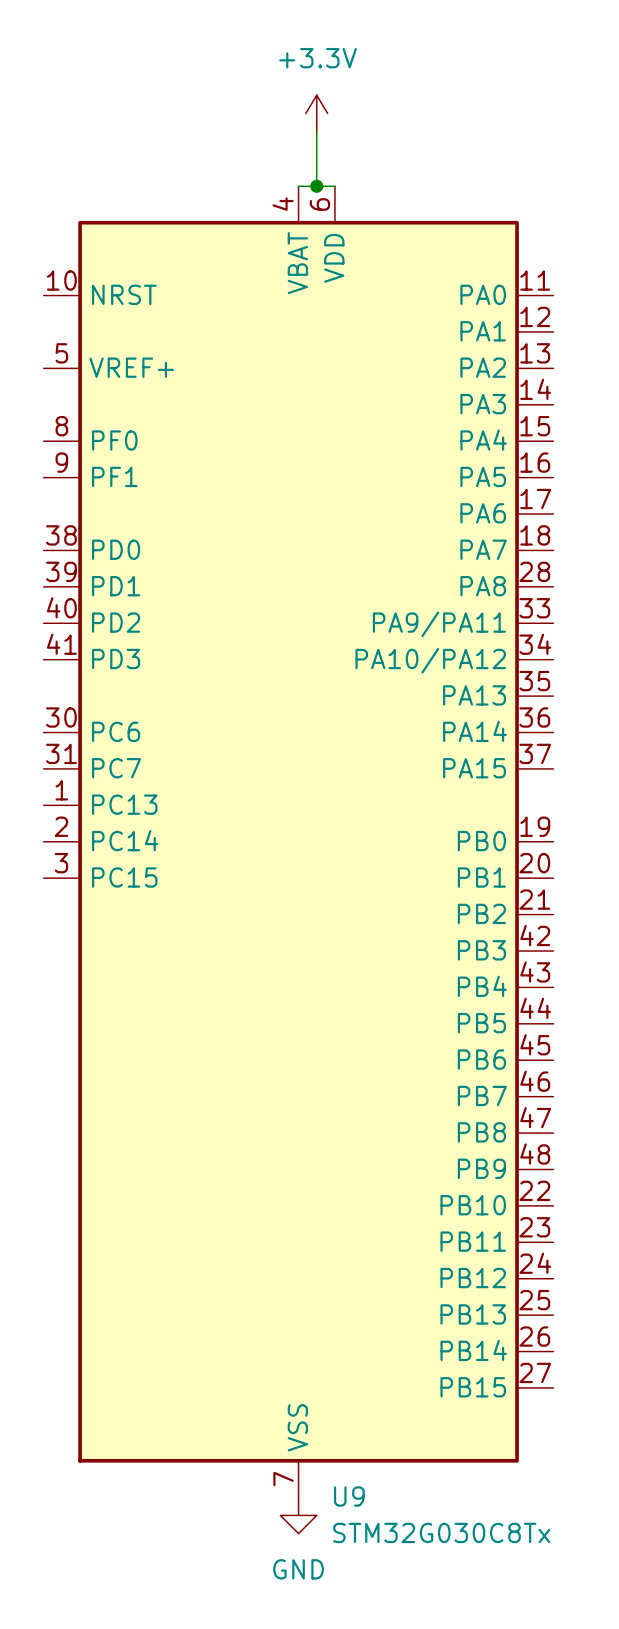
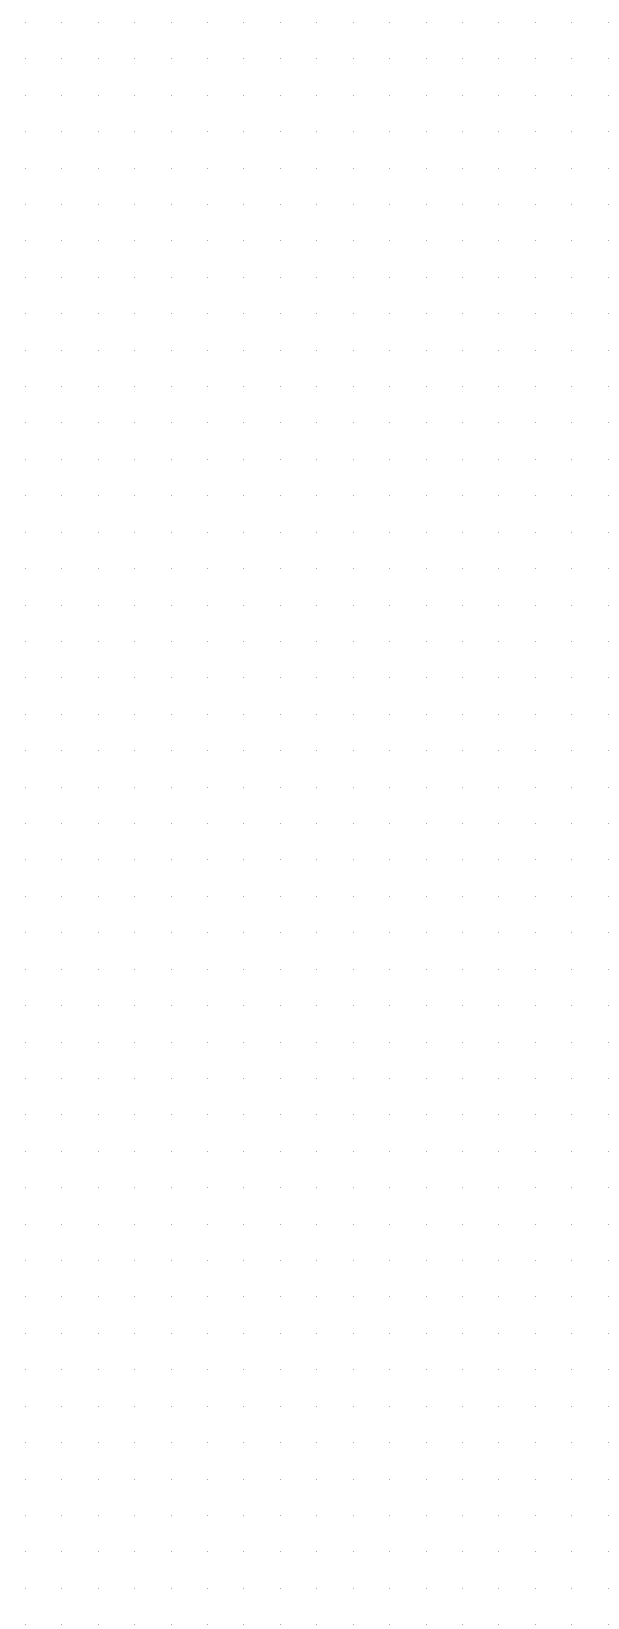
power symbol: +3.3V (316, 113) -> none
wire: (316, 131) (316, 186) -> none
wire: (298, 186) (334, 186) -> none
junction: (316, 186) -> none
U9: STM32G030C8Tx (298, 841) -> none
power symbol: GND (298, 1515) -> none

